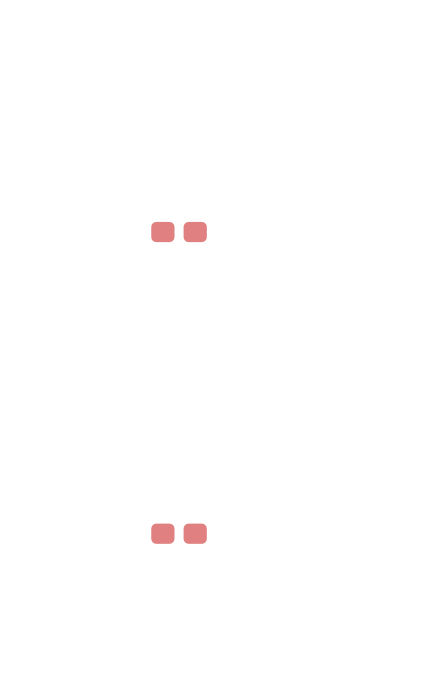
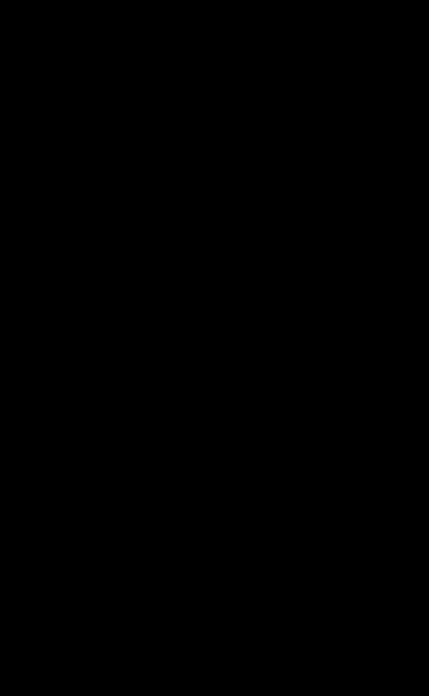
part: (179, 232) -> none
part: (179, 533) -> none

